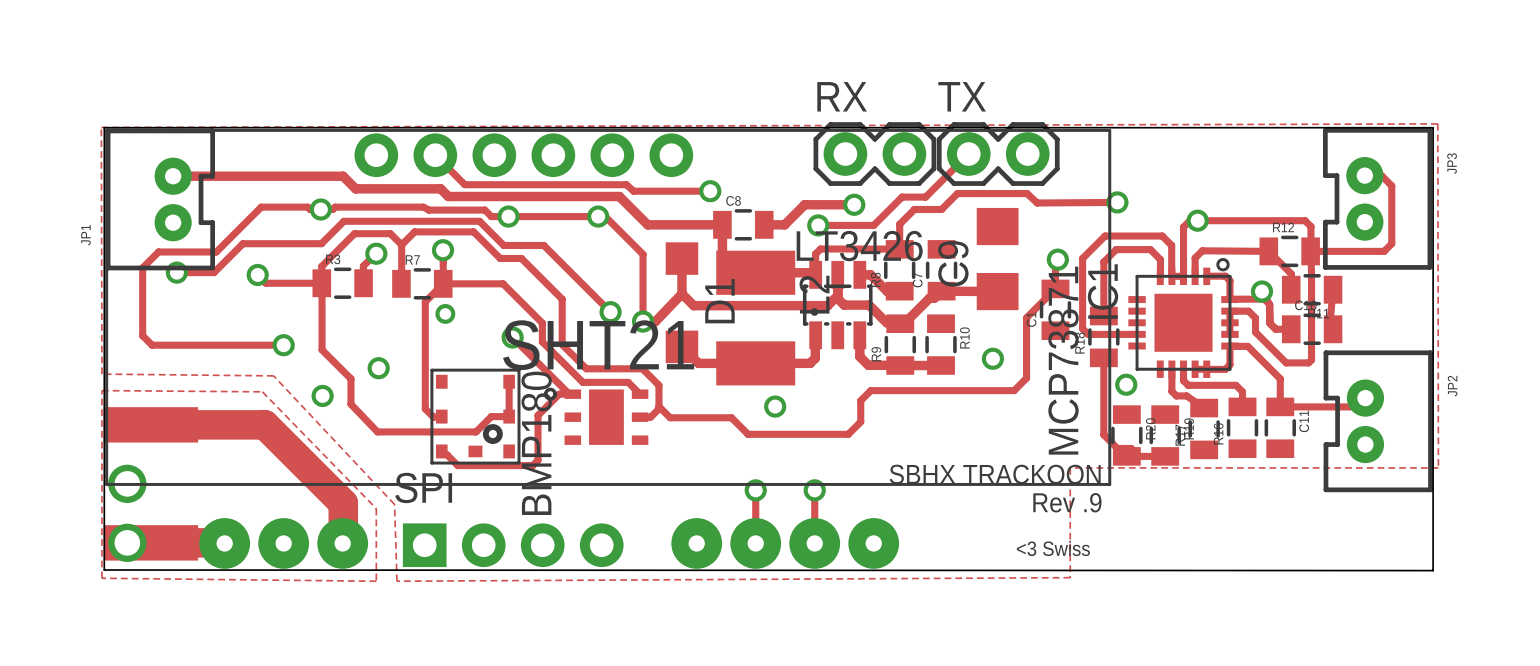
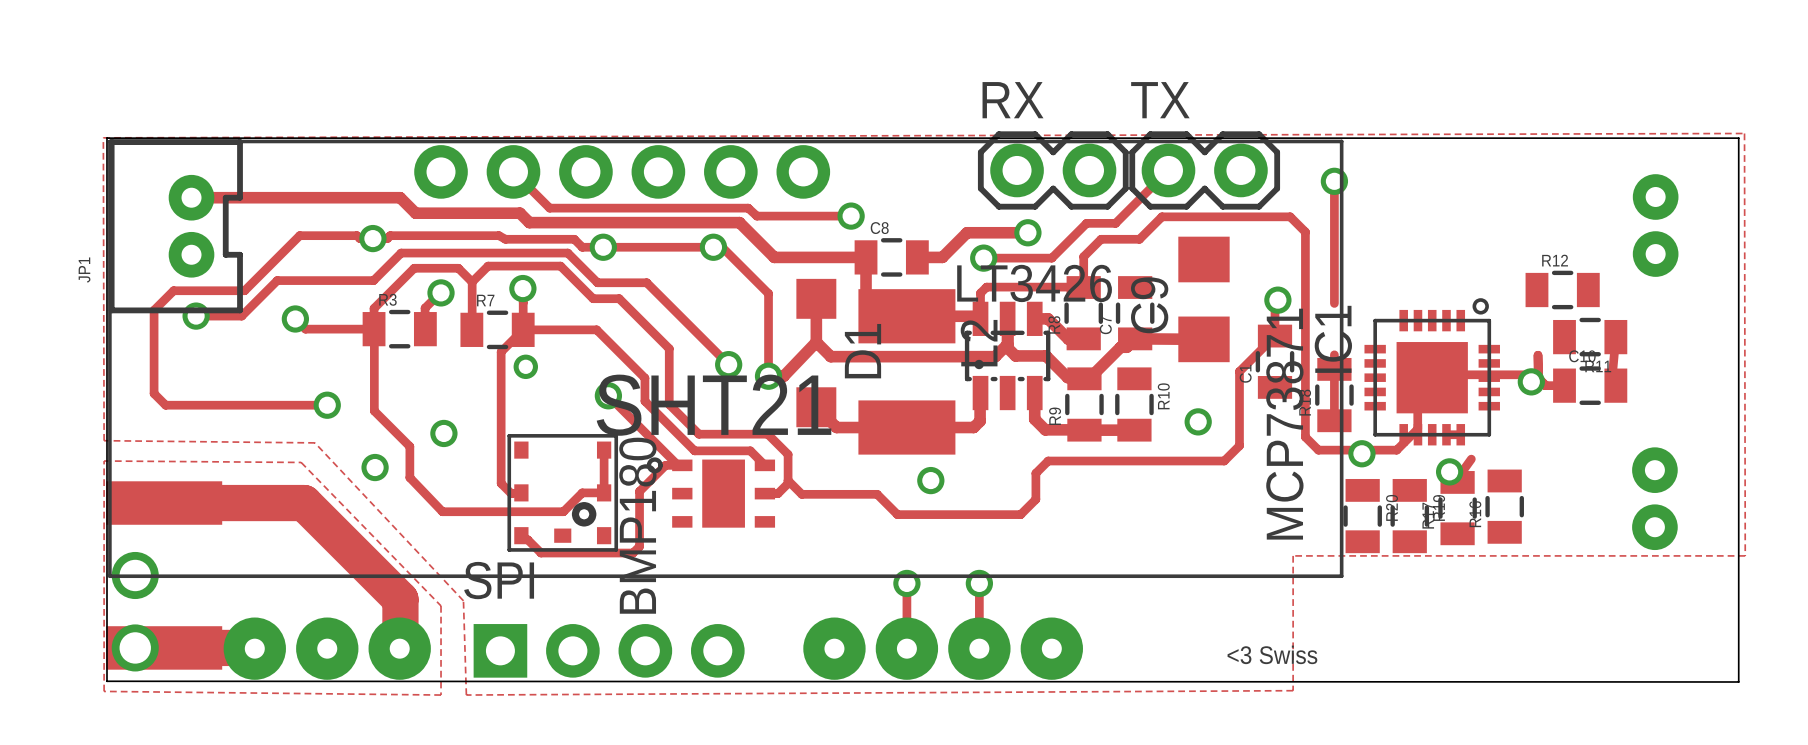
track: (1365, 175) (1381, 175) (1391, 185) (1391, 243) (1384, 251) (1310, 251) -> none
JP3 side: top (1377, 198) -> bottom (1654, 498)
track: (1117, 202) (1037, 203) (1027, 193) (957, 193) (941, 209) (913, 210) -> (1531, 381) (1528, 374) (1431, 374) (1417, 388) (1417, 429) (1396, 450) (1318, 450) (1305, 437) (1305, 232) (1290, 216) (1161, 216) (1139, 239) (1101, 239)
via position: (1117, 202) -> (1334, 181)
via: (1197, 220) -> none
track: (1310, 251) (1311, 359) (1308, 362) (1286, 362) (1255, 332) (1255, 318) (1248, 311) (1229, 311) (1229, 334) -> none
track: (1310, 251) (1310, 226) (1305, 220) (1190, 220) (1183, 227) (1183, 276) (1171, 276) -> none
track: (1103, 262) (1116, 249) (1150, 249) (1160, 259) (1160, 276) -> (1334, 303) (1334, 181)
track: (1103, 262) (1103, 304) -> none
track: (1171, 276) (1171, 245) (1162, 236) (1105, 236) (1082, 258) (1082, 328) (1088, 334) (1137, 334) -> none
track: (1195, 276) (1195, 258) (1202, 250) (1268, 251) (1291, 273) (1291, 289) -> none
track: (1206, 276) (1225, 276) (1229, 280) (1229, 299) (1264, 299) (1269, 304) (1261, 291) -> none
via position: (1261, 291) -> (1531, 381)
track: (1103, 358) (1103, 434) (1117, 448) (1131, 448) (1126, 456) (1165, 456) -> (1334, 420) (1334, 369)
track: (1171, 369) (1171, 391) (1176, 395) (1186, 395) (1204, 408) -> none
track: (1183, 369) (1183, 380) (1188, 385) (1236, 385) (1242, 391) (1242, 406) -> none
track: (1206, 369) (1225, 369) (1229, 364) (1229, 346) (1247, 346) (1280, 378) (1280, 406) (1362, 406) (1367, 399) (1365, 398) -> none
track: none -> (1471, 459) (1462, 471) (1449, 471)
via: none -> (1449, 471)
JP2 side: top (1378, 421) -> bottom (1655, 225)
C11: (1280, 427) -> none
text: SBHX TRACKOON (995, 474) -> none
text: Rev .9 (1067, 502) -> none

